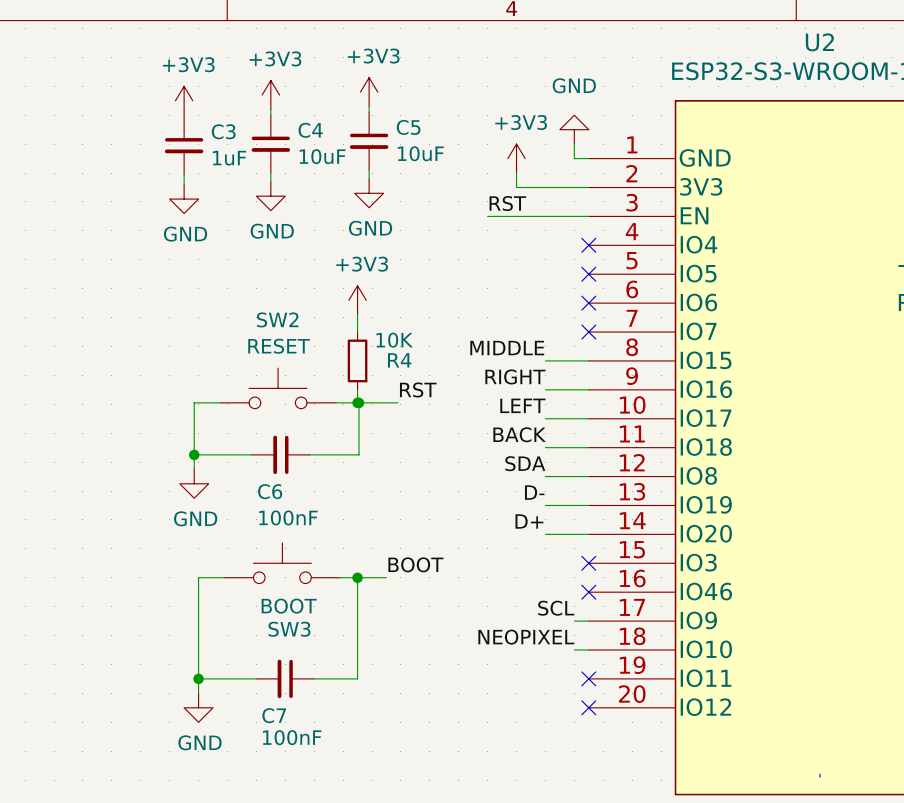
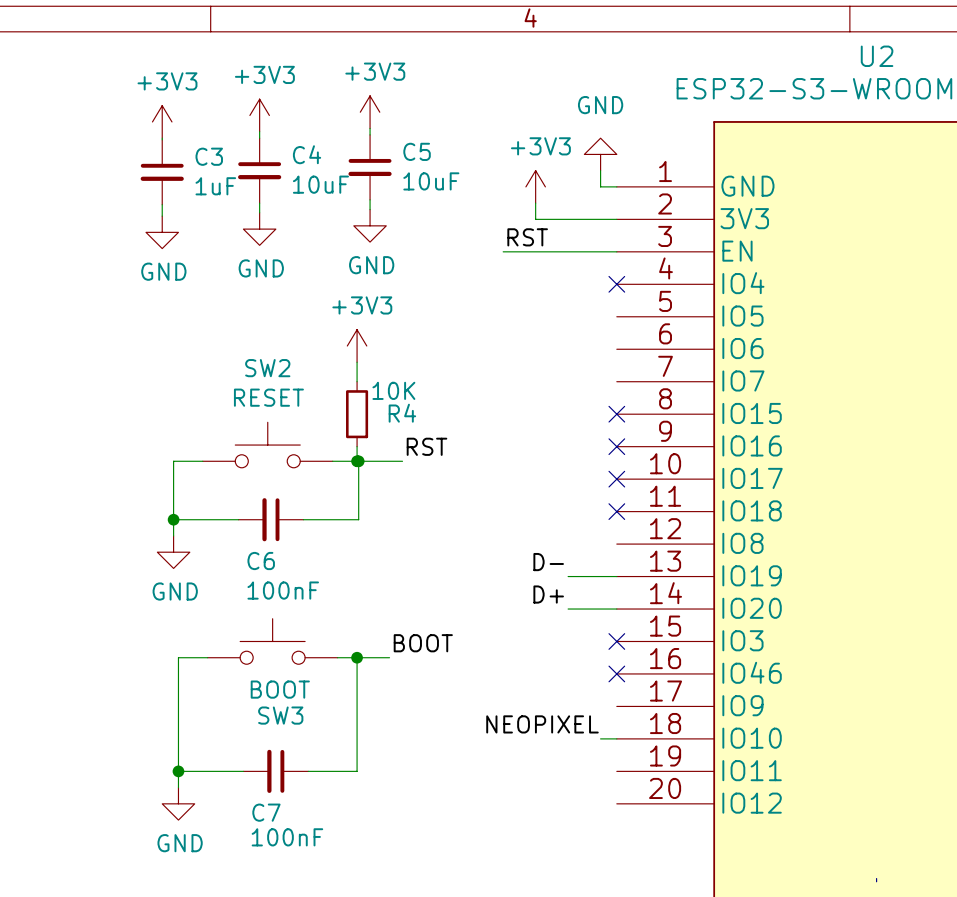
no-connect mark: (588, 274) -> none
no-connect mark: (588, 303) -> none
no-connect mark: (588, 332) -> none
label: MIDDLE (507, 348) -> none
wire: (545, 360) (588, 360) -> none
no-connect mark: none -> (616, 414)
label: RIGHT (515, 376) -> none
wire: (545, 389) (588, 389) -> none
no-connect mark: none -> (616, 446)
label: LEFT (522, 405) -> none
wire: (545, 418) (588, 418) -> none
no-connect mark: none -> (616, 479)
label: BACK (519, 434) -> none
wire: (545, 447) (588, 447) -> none
no-connect mark: none -> (616, 511)
label: SDA (525, 463) -> none
wire: (545, 476) (588, 476) -> none
label: SCL (556, 608) -> none
wire: (574, 621) (588, 621) -> none
no-connect mark: (588, 678) -> none
no-connect mark: (588, 707) -> none

